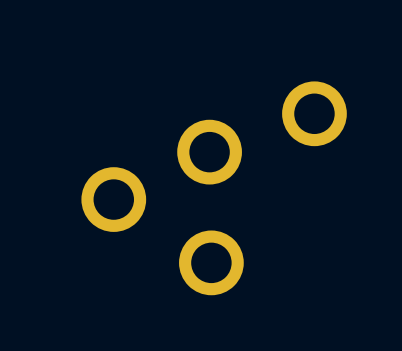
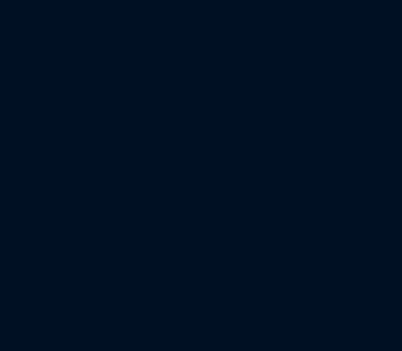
part: (314, 113) -> none
part: (209, 152) -> none
part: (113, 199) -> none
part: (211, 262) -> none

